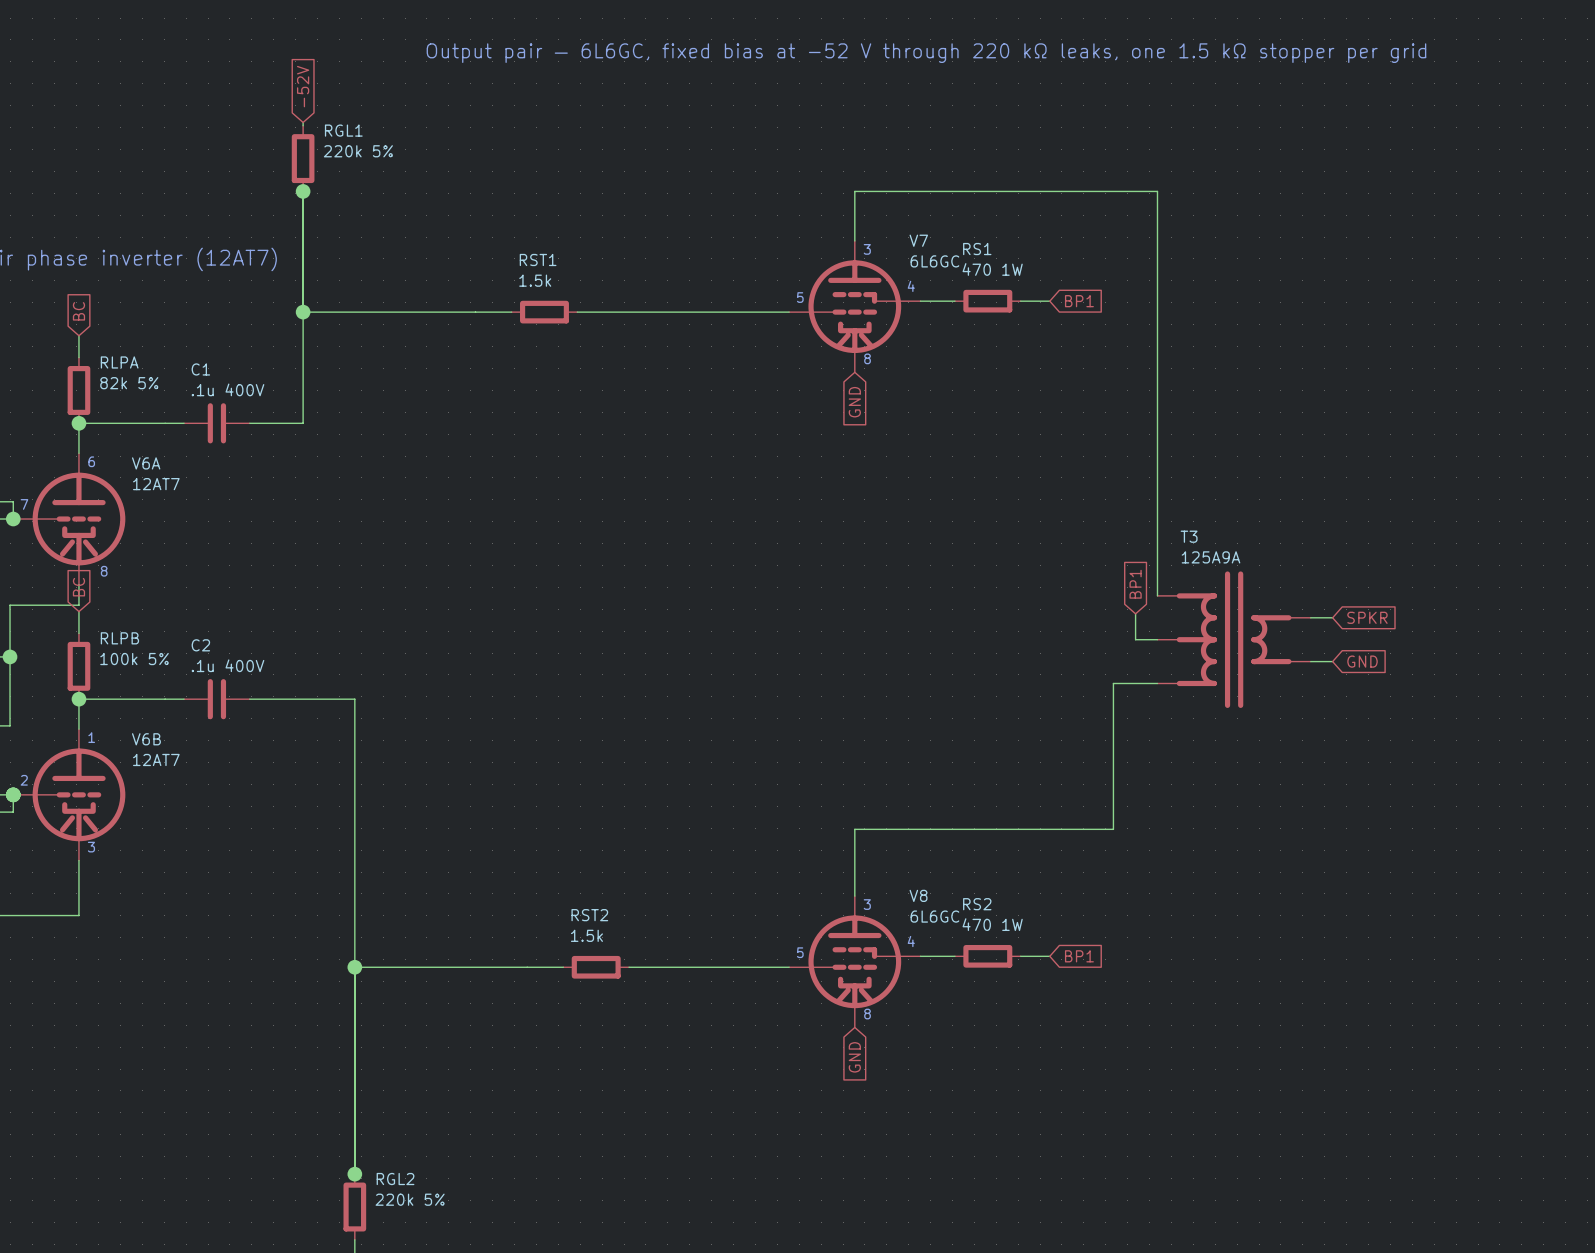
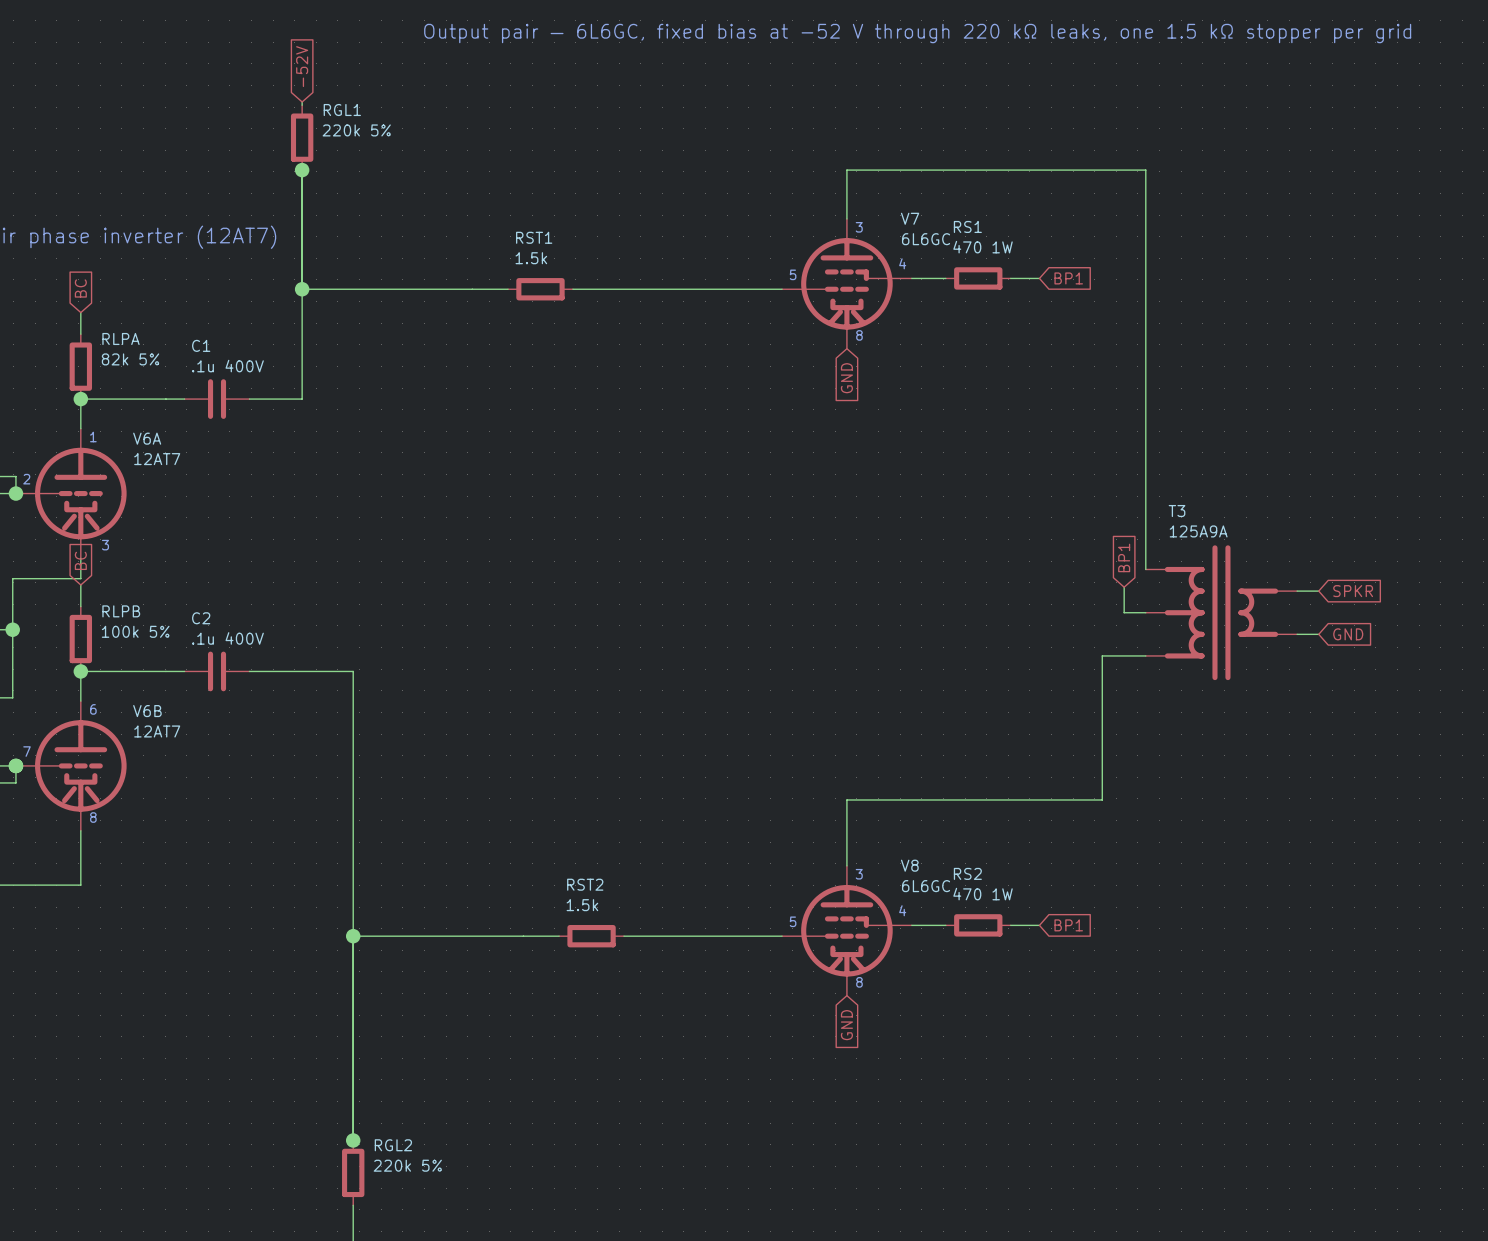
text: 6 (91, 461) -> 1 (93, 437)
text: 7 (24, 504) -> 2 (26, 479)
text: 8 (104, 571) -> 3 (105, 545)
text: 1 (91, 737) -> 6 (93, 709)
text: 2 (24, 780) -> 7 (27, 751)
text: 3 (91, 847) -> 8 (93, 817)

